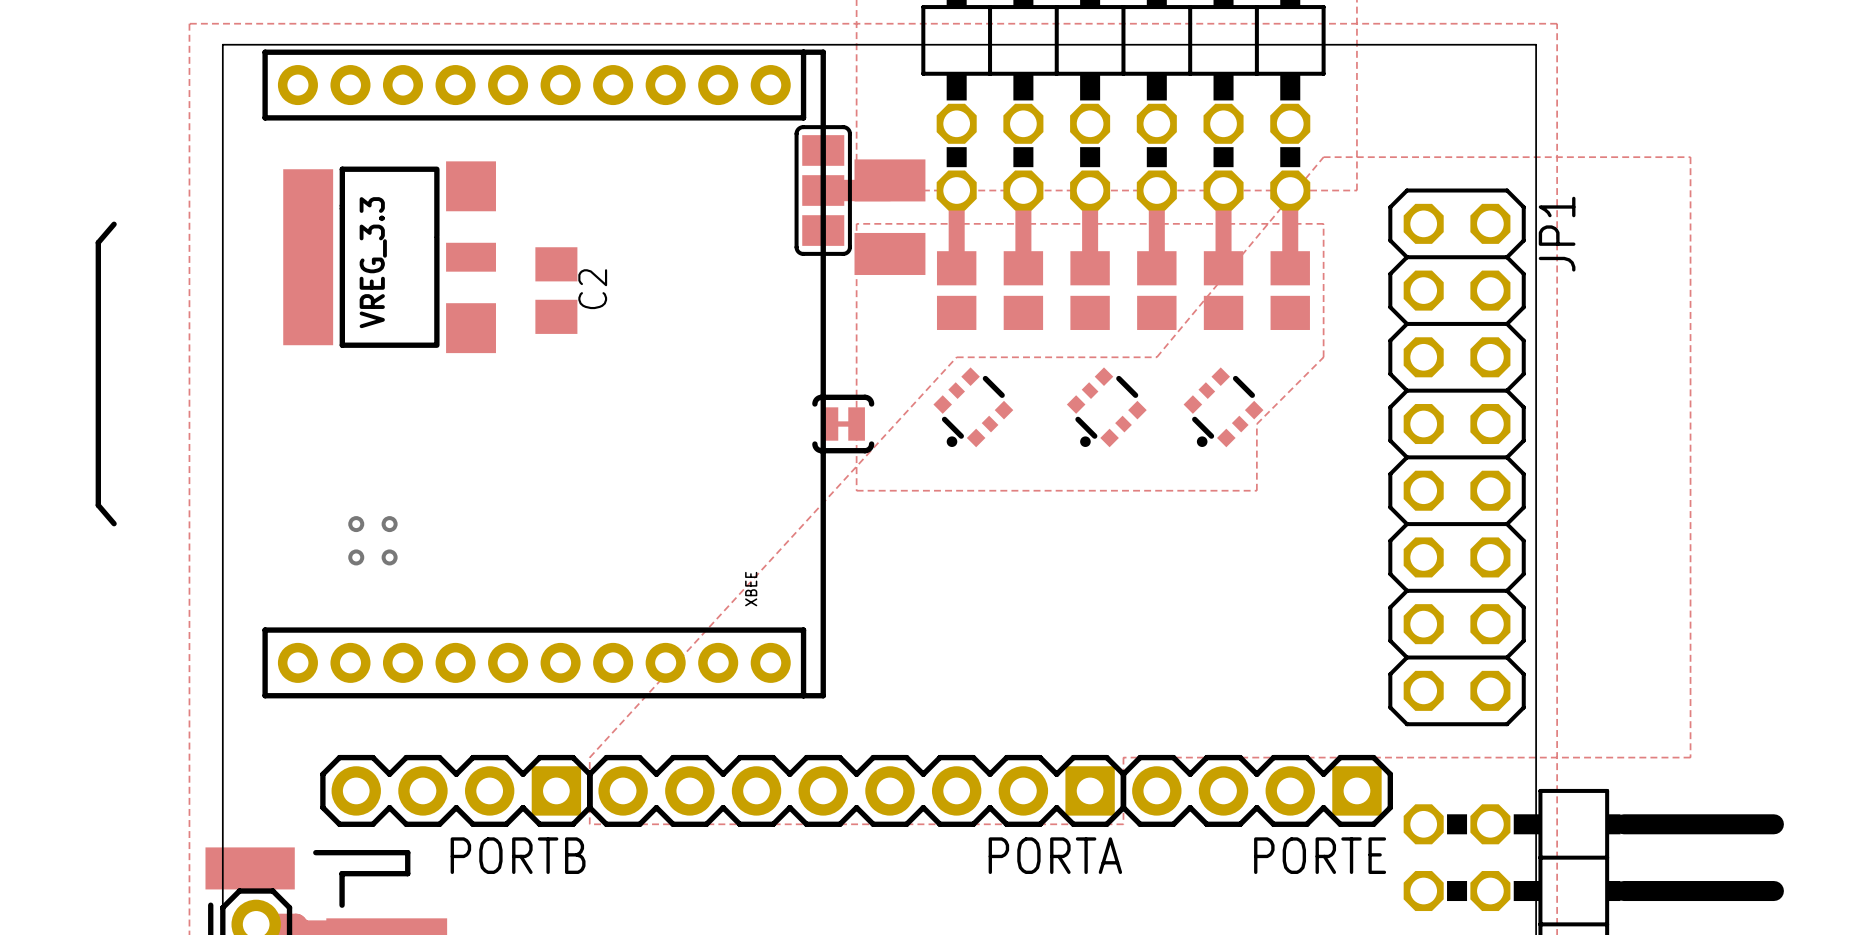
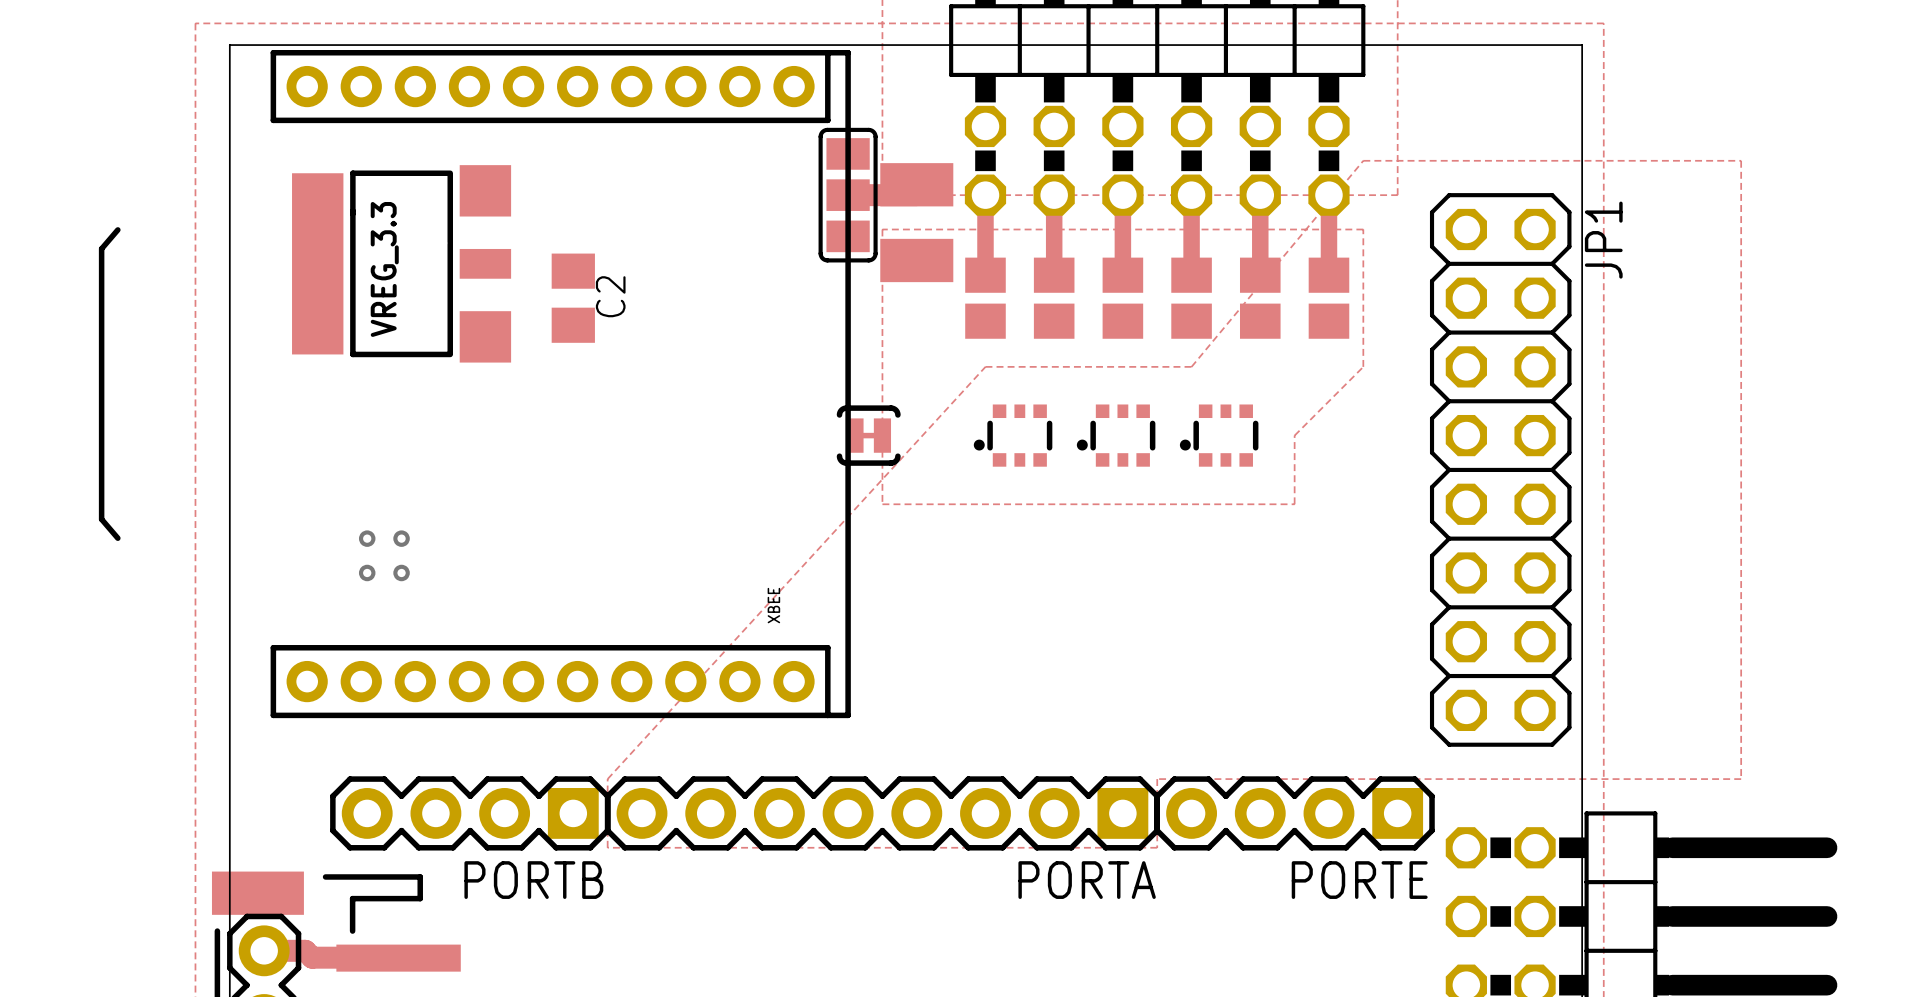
part rotation: 0° (973, 407) -> 45° clockwise (1013, 435)
part: (1106, 407) -> none
part: (1223, 407) -> none
part: none -> (1116, 435)
part: none -> (1219, 435)

